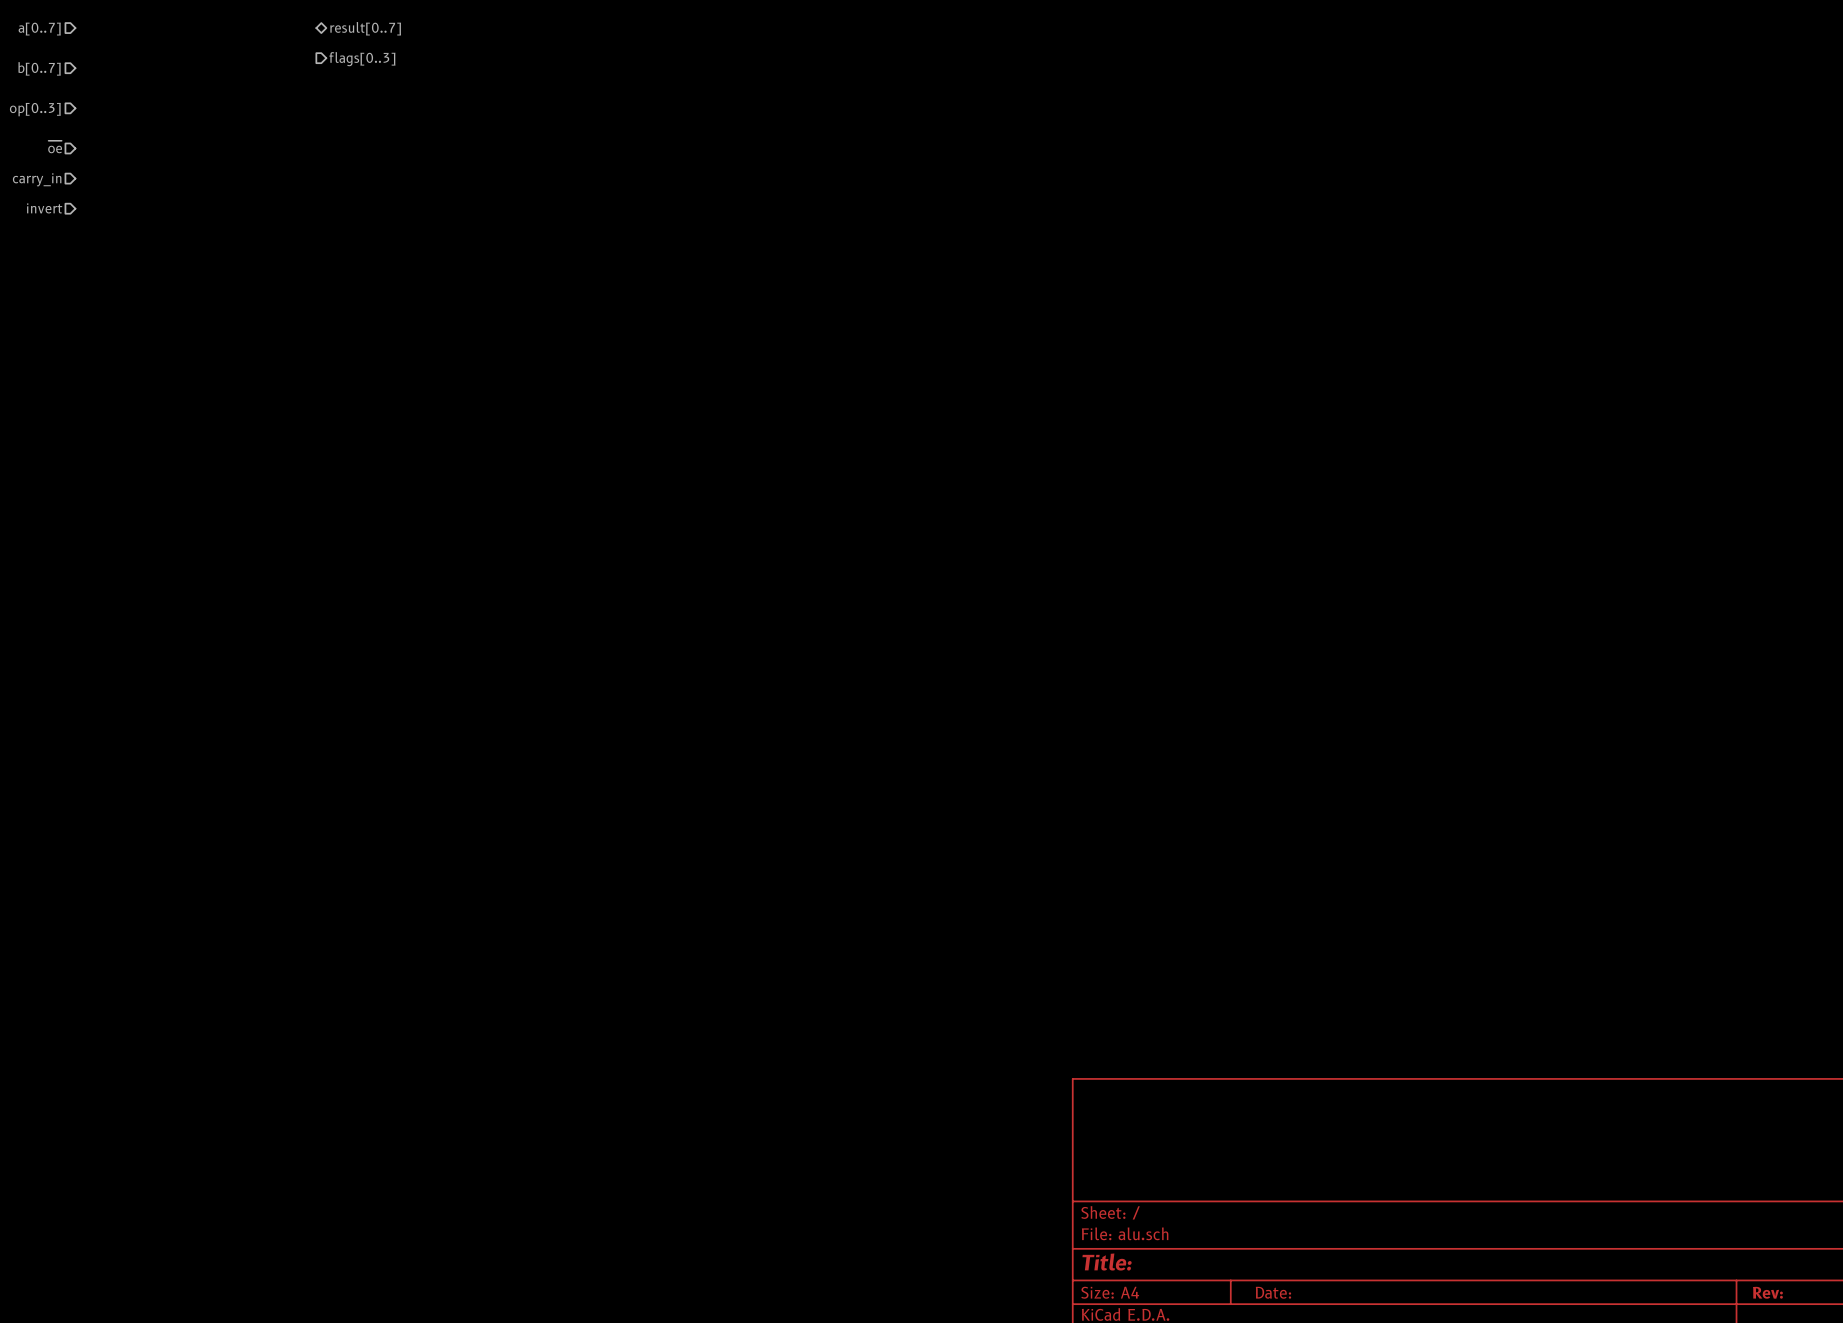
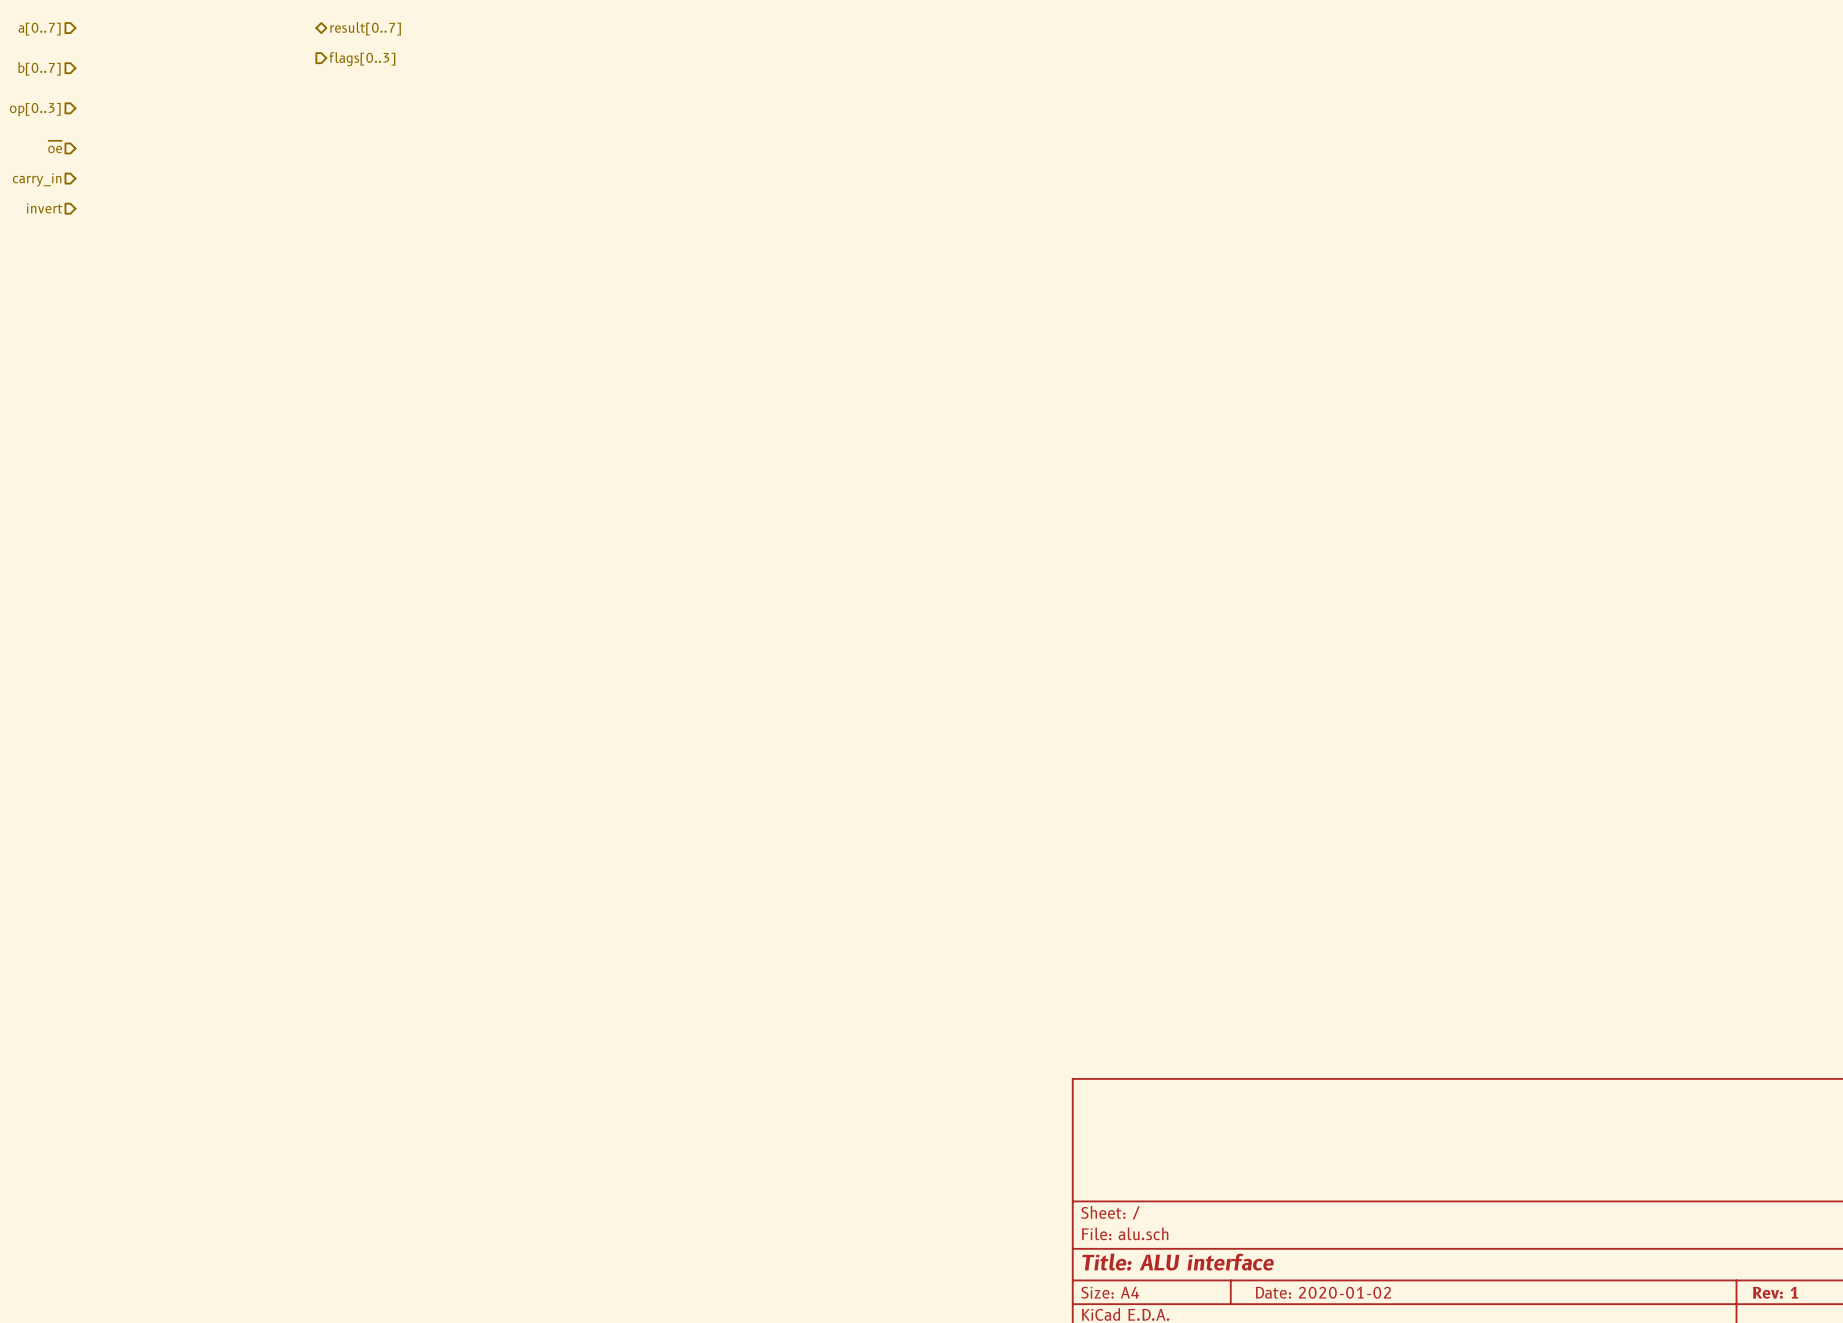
title block: Title: (1107, 1262) -> Title: ALU interface (1178, 1262)
title block: Date: (1273, 1292) -> Date: 2020-01-02 (1323, 1292)
title block: Rev: (1767, 1292) -> Rev: 1 (1775, 1292)

